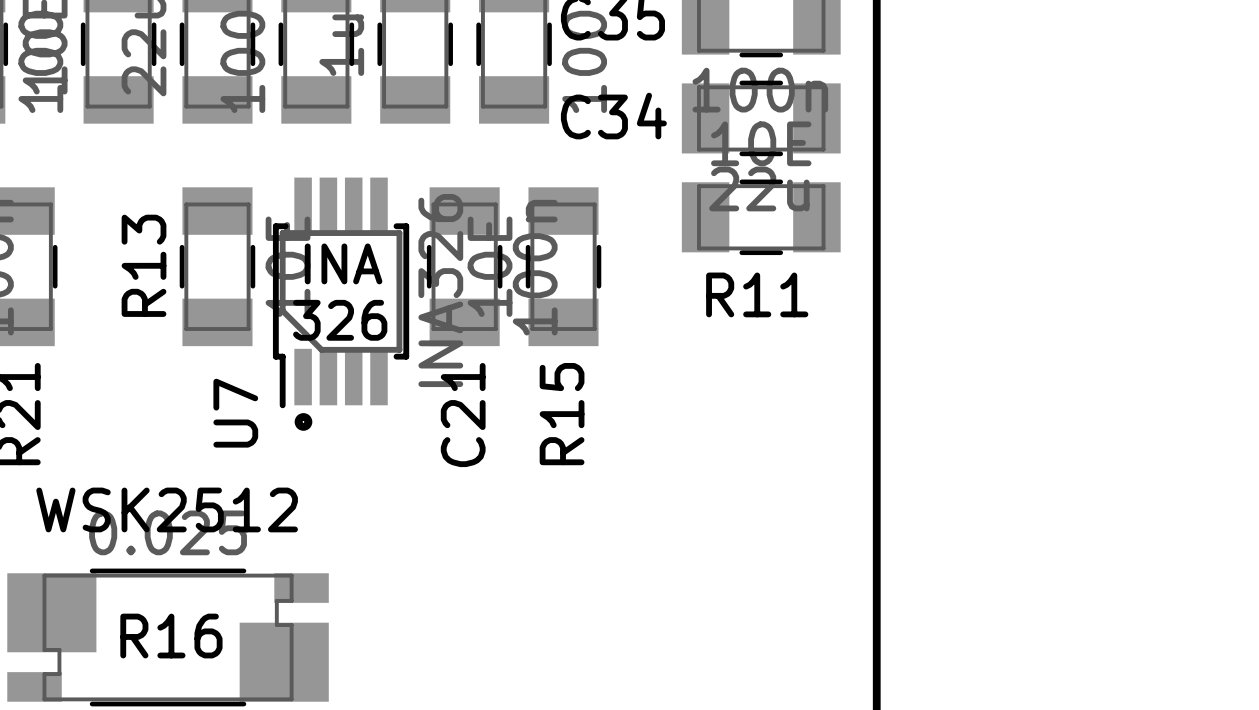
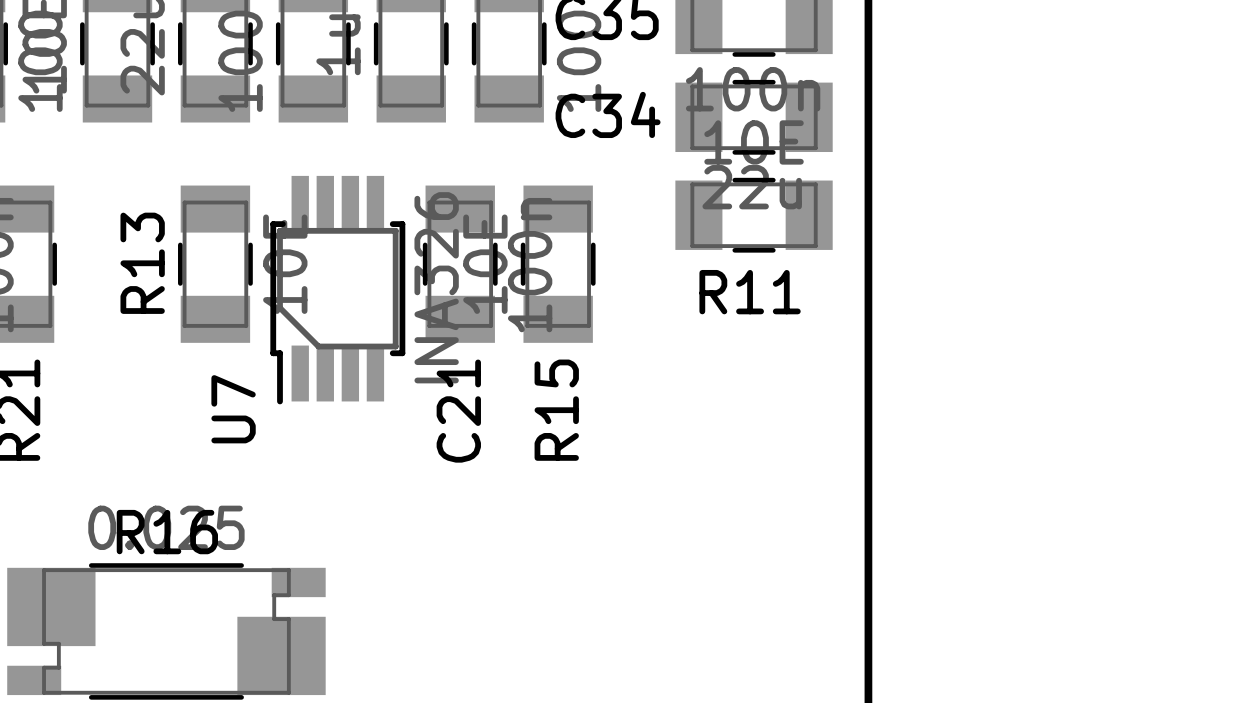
text: INA (343, 263) -> none
text: 326 (340, 320) -> none
drawing: [294, 413, 313, 431] -> none
text: WSK2512 (167, 509) -> none
R16 name position: R16 (171, 636) -> R16 (167, 532)

